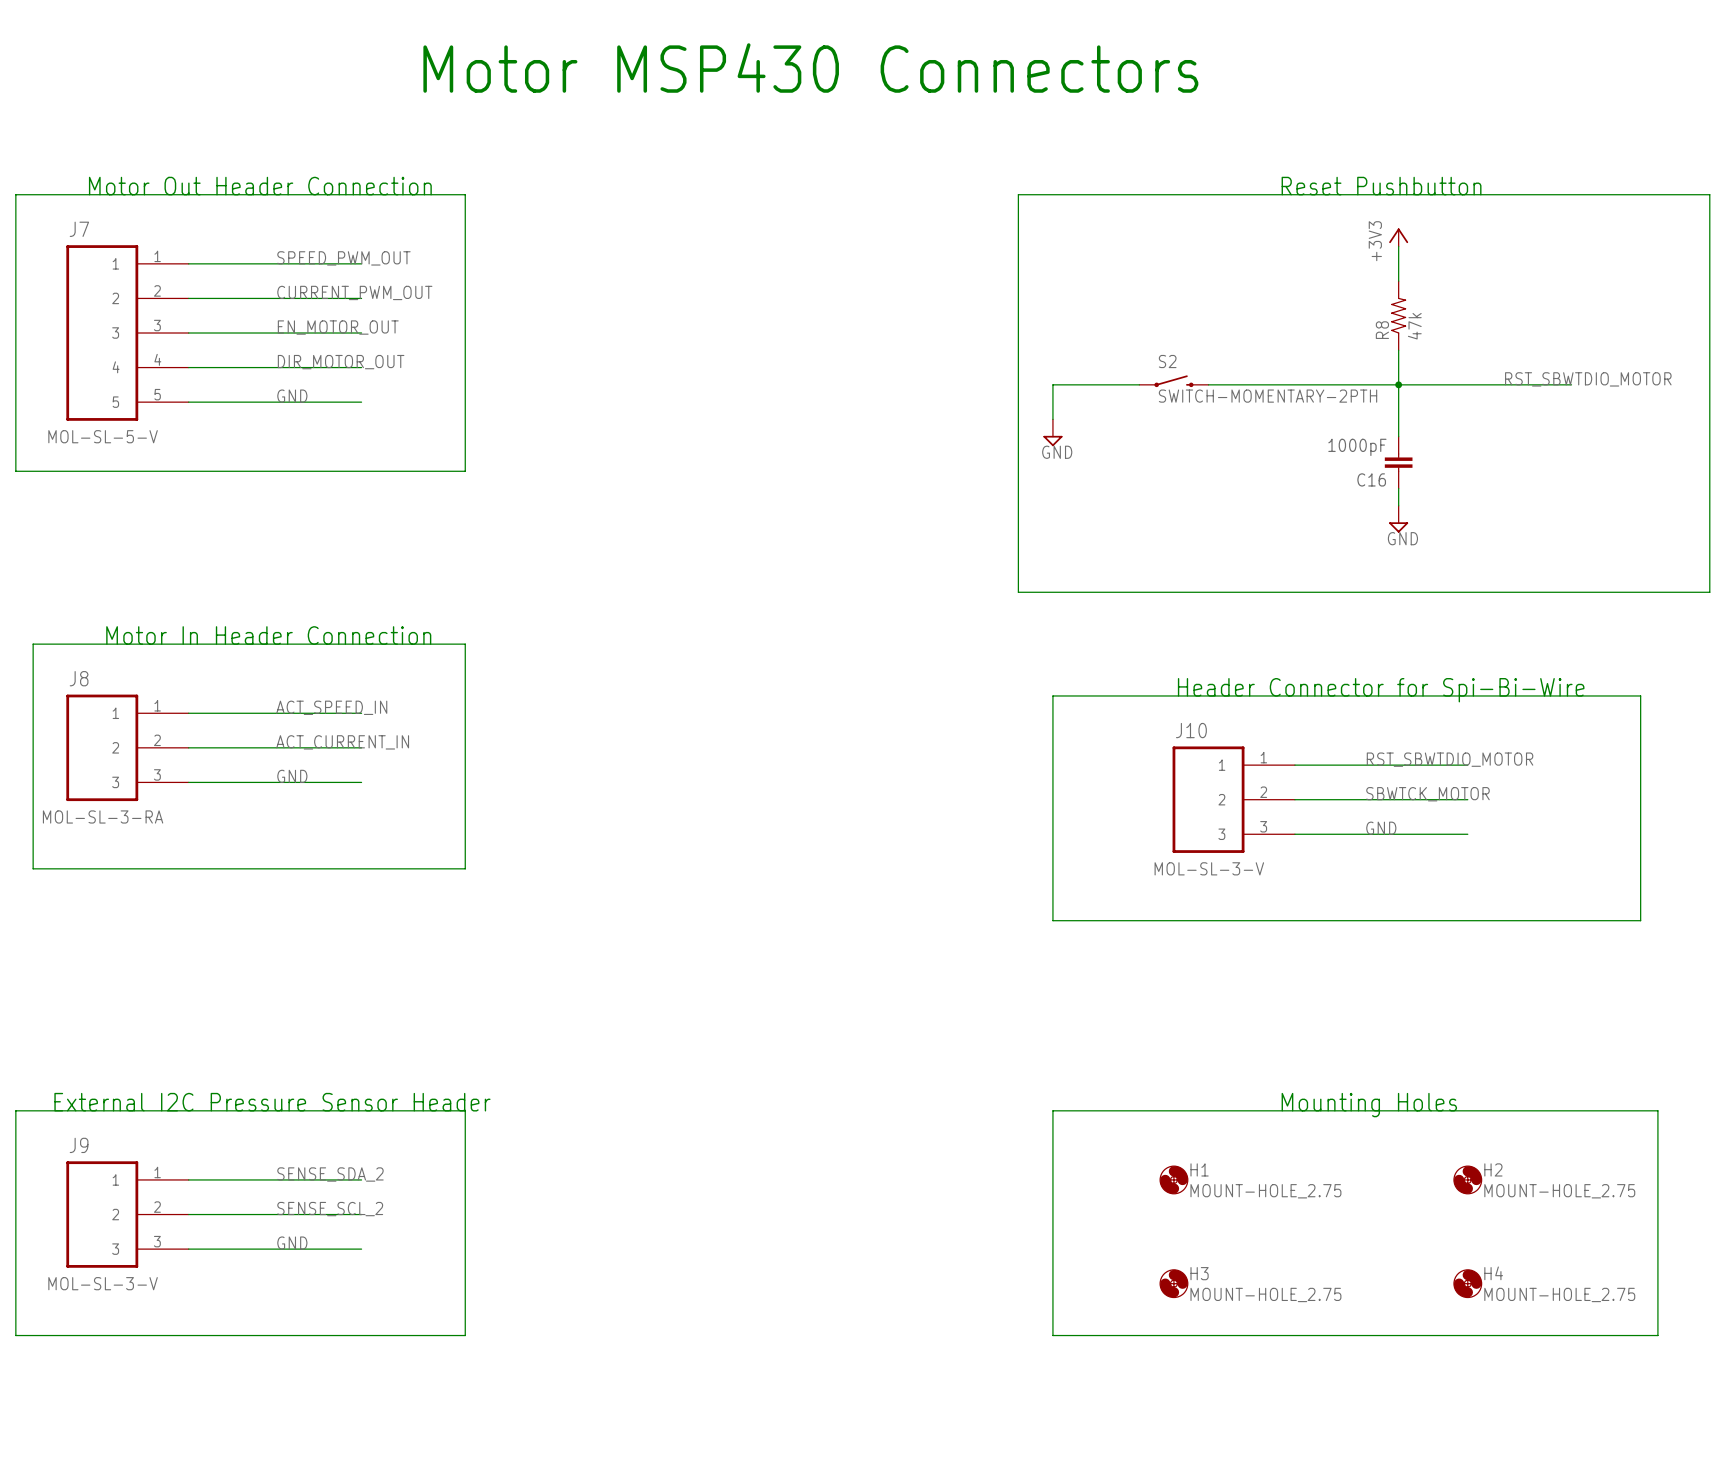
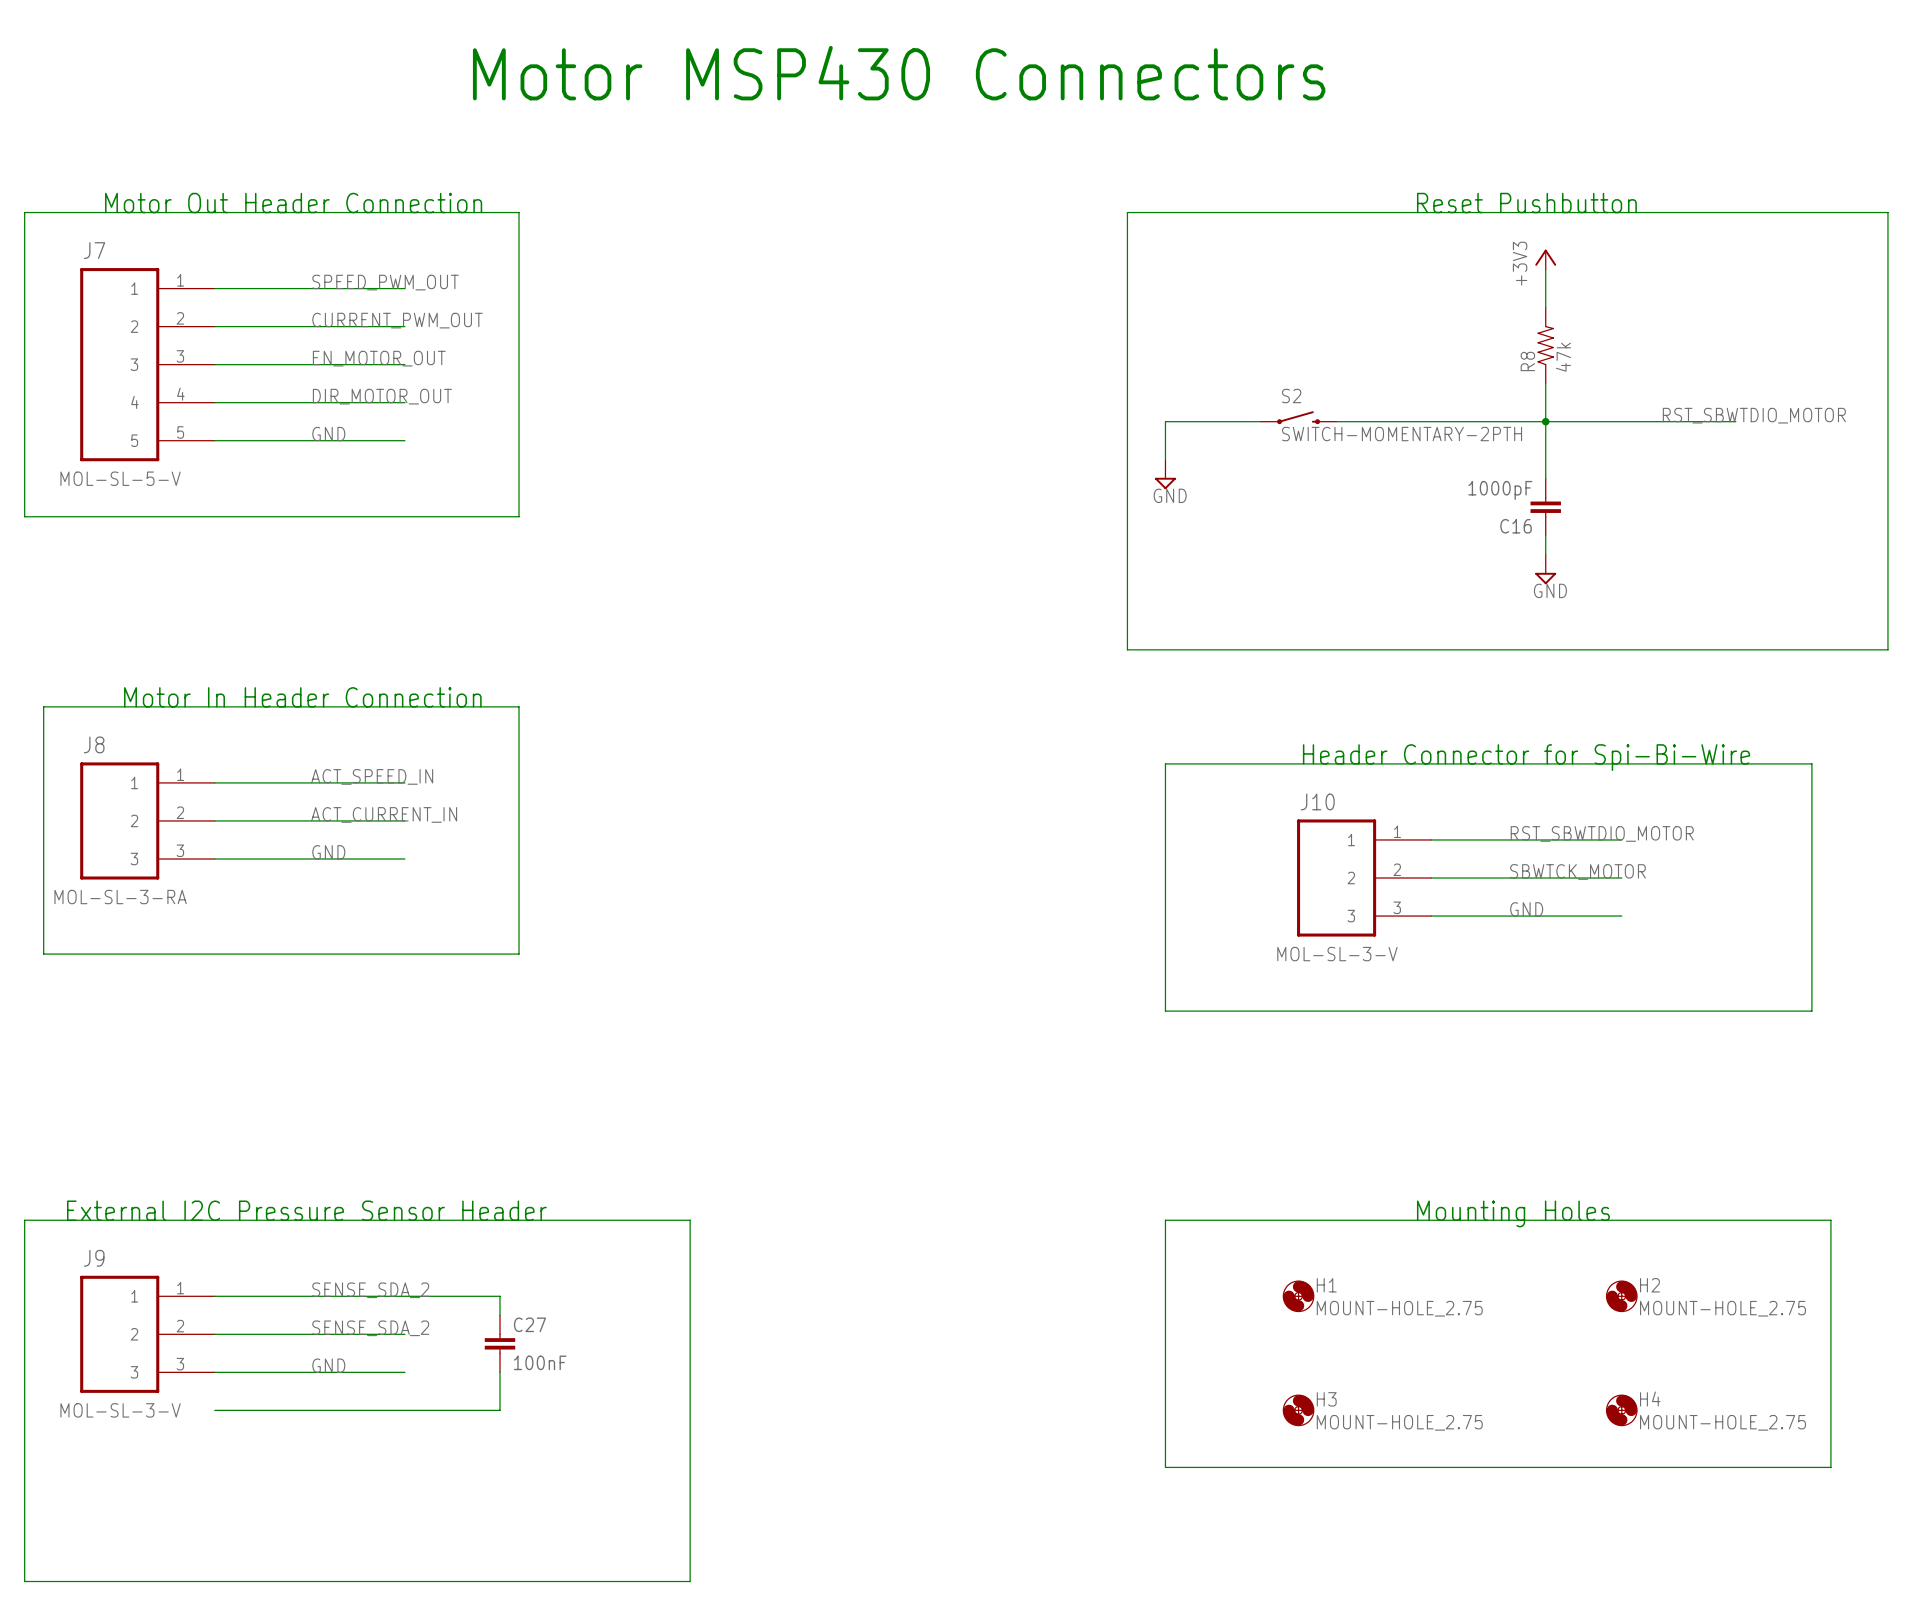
wire: (465, 1110) (465, 1335) (15, 1335) -> (519, 1220) (690, 1220) (690, 1581) (24, 1581) (24, 1467)
wire: none -> (404, 1296) (499, 1296) (499, 1315)
label: SENSE_SCL_2 (330, 1209) -> SENSE_SDA_2 (370, 1328)
C27: none -> 100nF (499, 1343)
wire: none -> (499, 1372) (499, 1410) (214, 1410)

